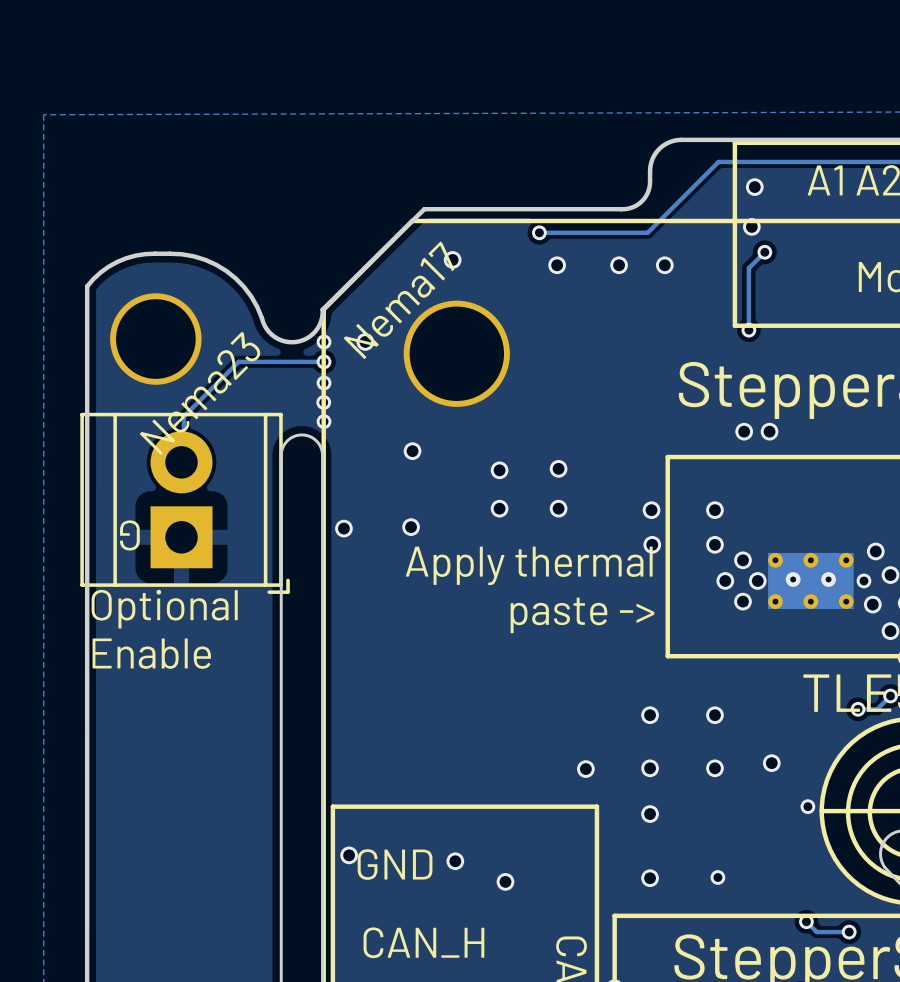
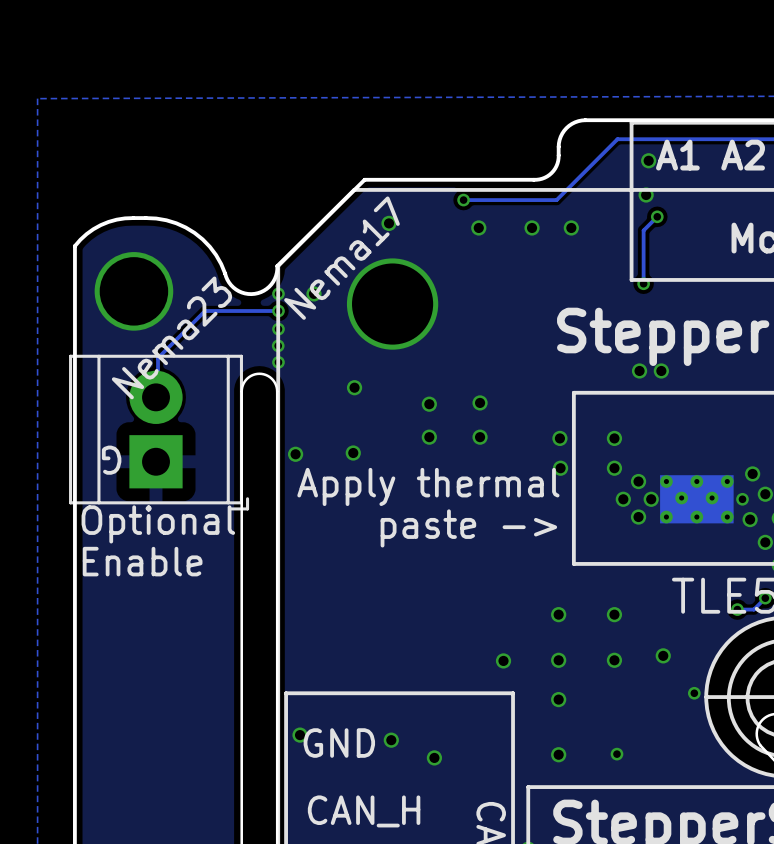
track: (806, 921) (816, 932) (849, 932) -> none
via: (806, 921) -> none
via: (849, 932) -> none

